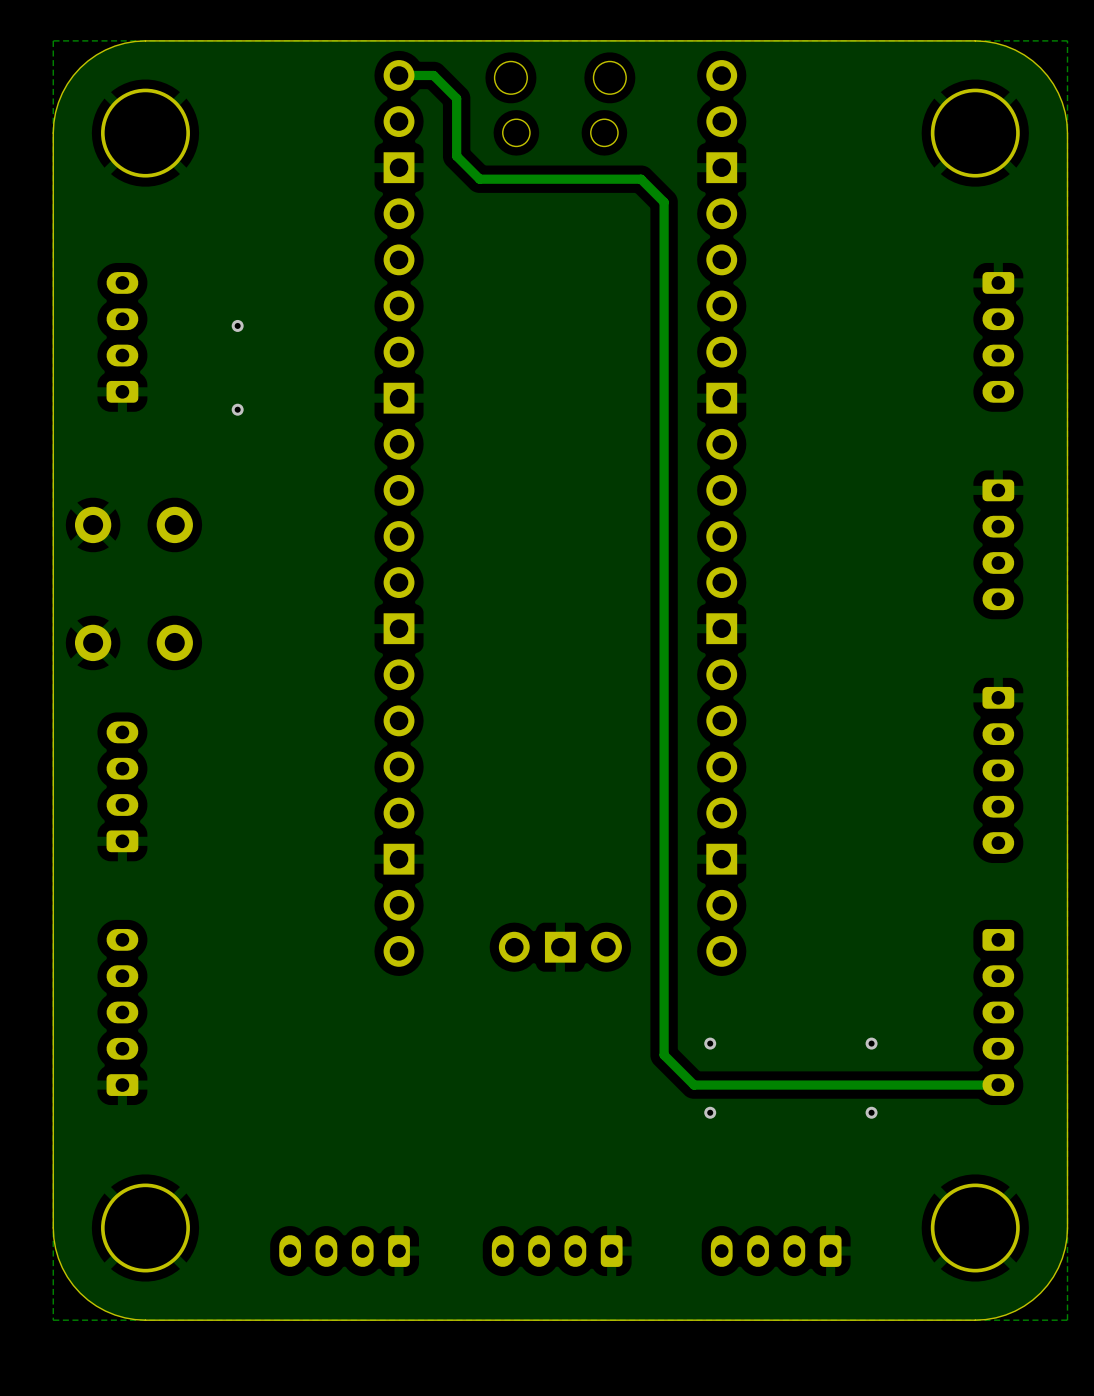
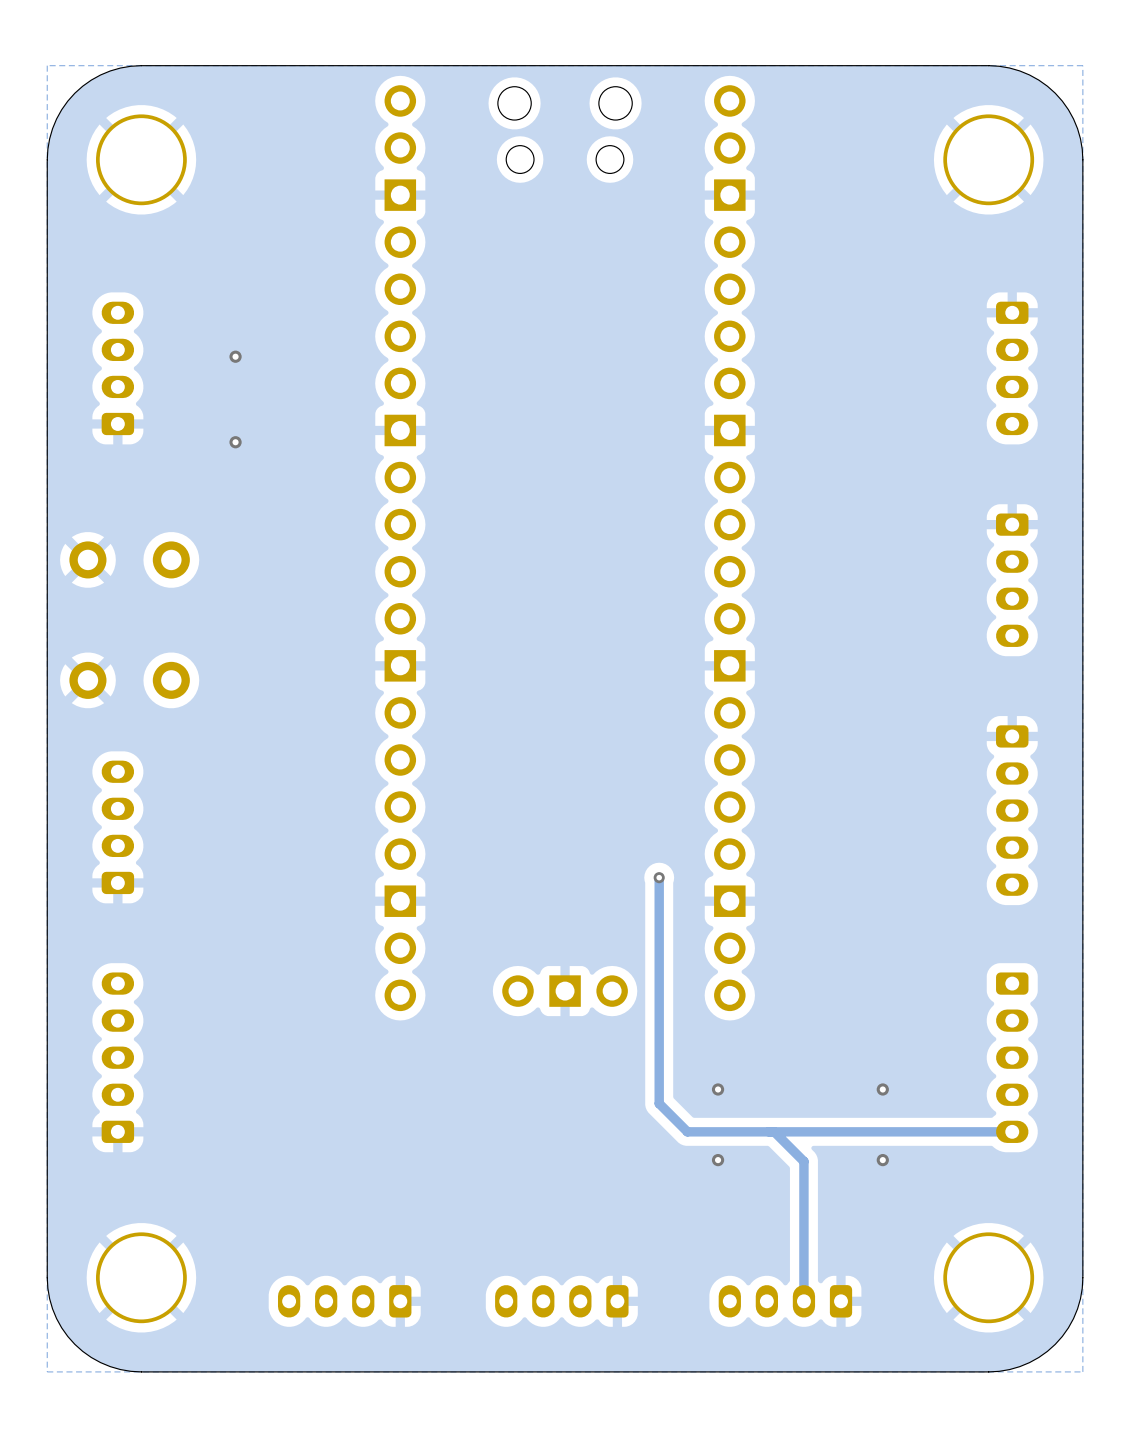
track: (399, 75) (433, 75) (456, 98) (456, 156) (479, 179) (641, 179) (664, 202) (664, 1055) (694, 1085) -> (659, 877) (659, 1103) (687, 1131) (701, 1131)
via: none -> (659, 877)
track: none -> (774, 1131) (803, 1161) (803, 1301)

